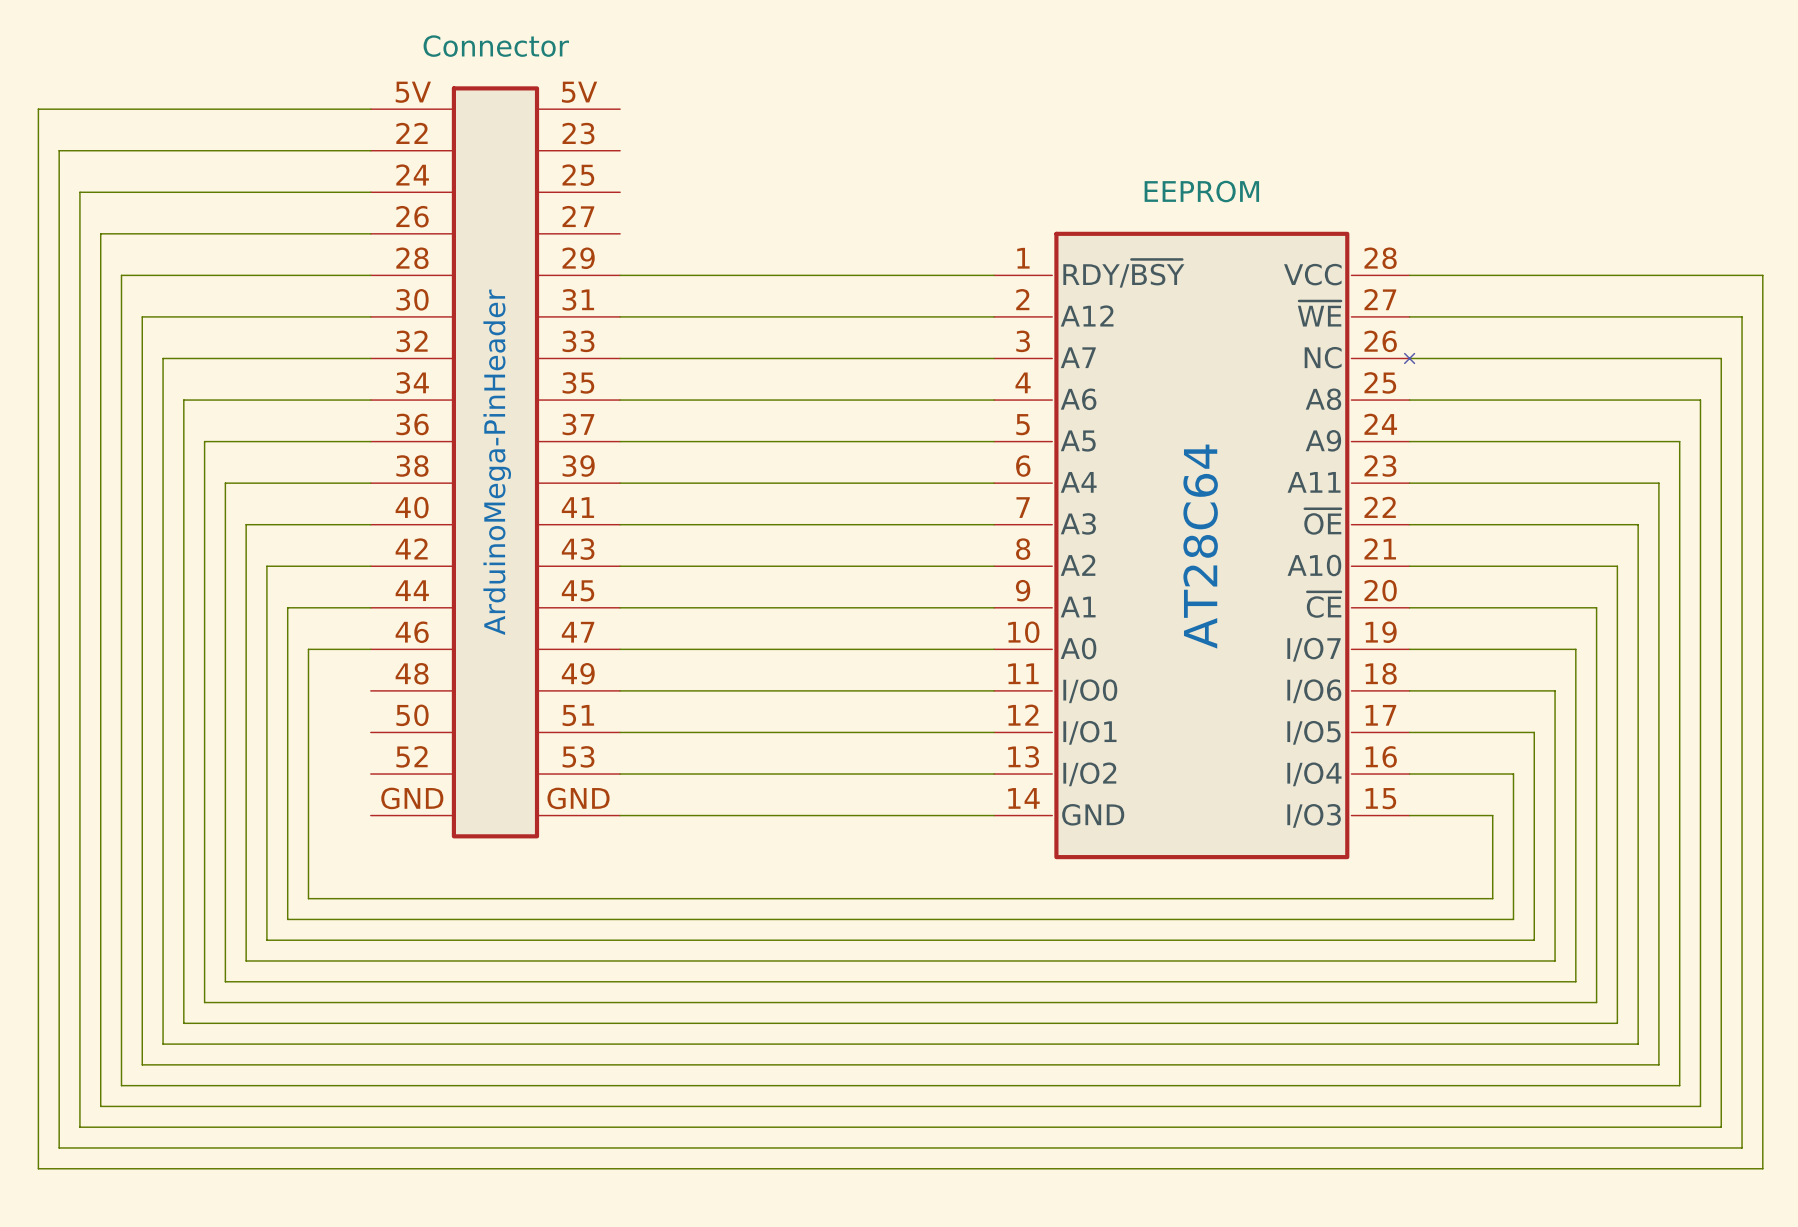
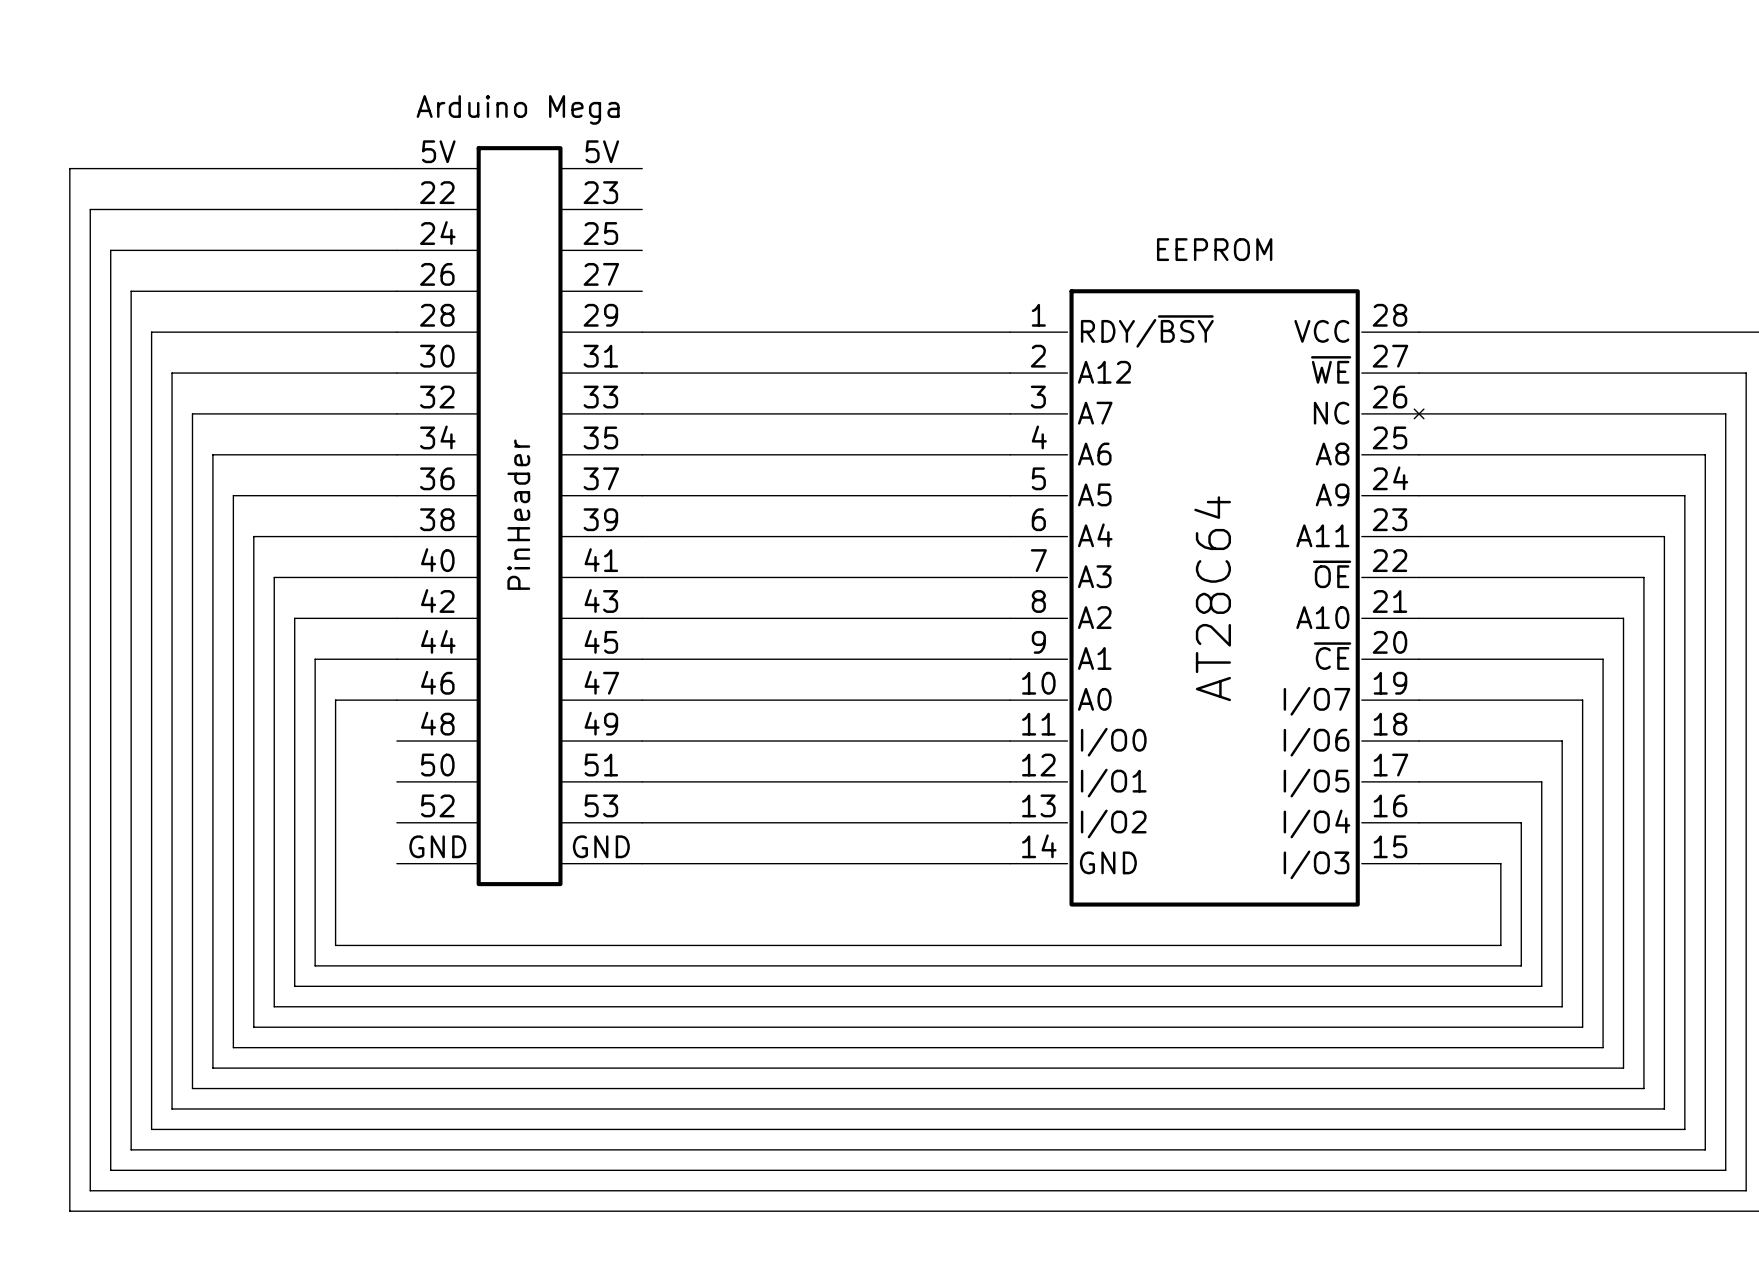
ArduinoMega-PinHeader value: Connector (496, 46) -> Arduino Mega (518, 109)
ArduinoMega-PinHeader name: ArduinoMega-PinHeader (497, 462) -> PinHeader (518, 514)

